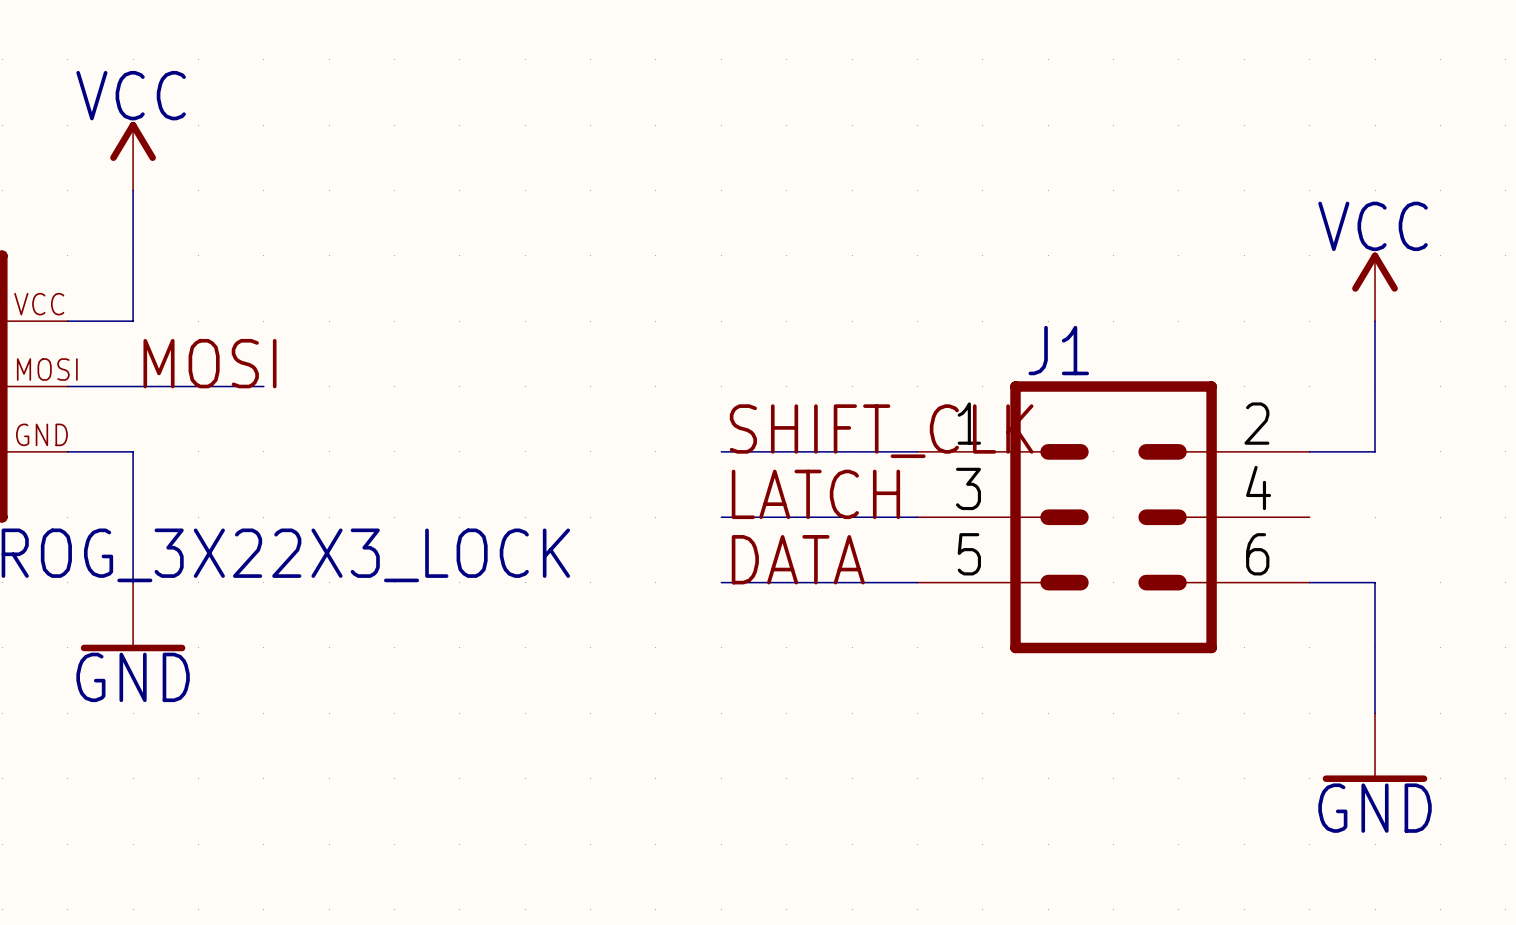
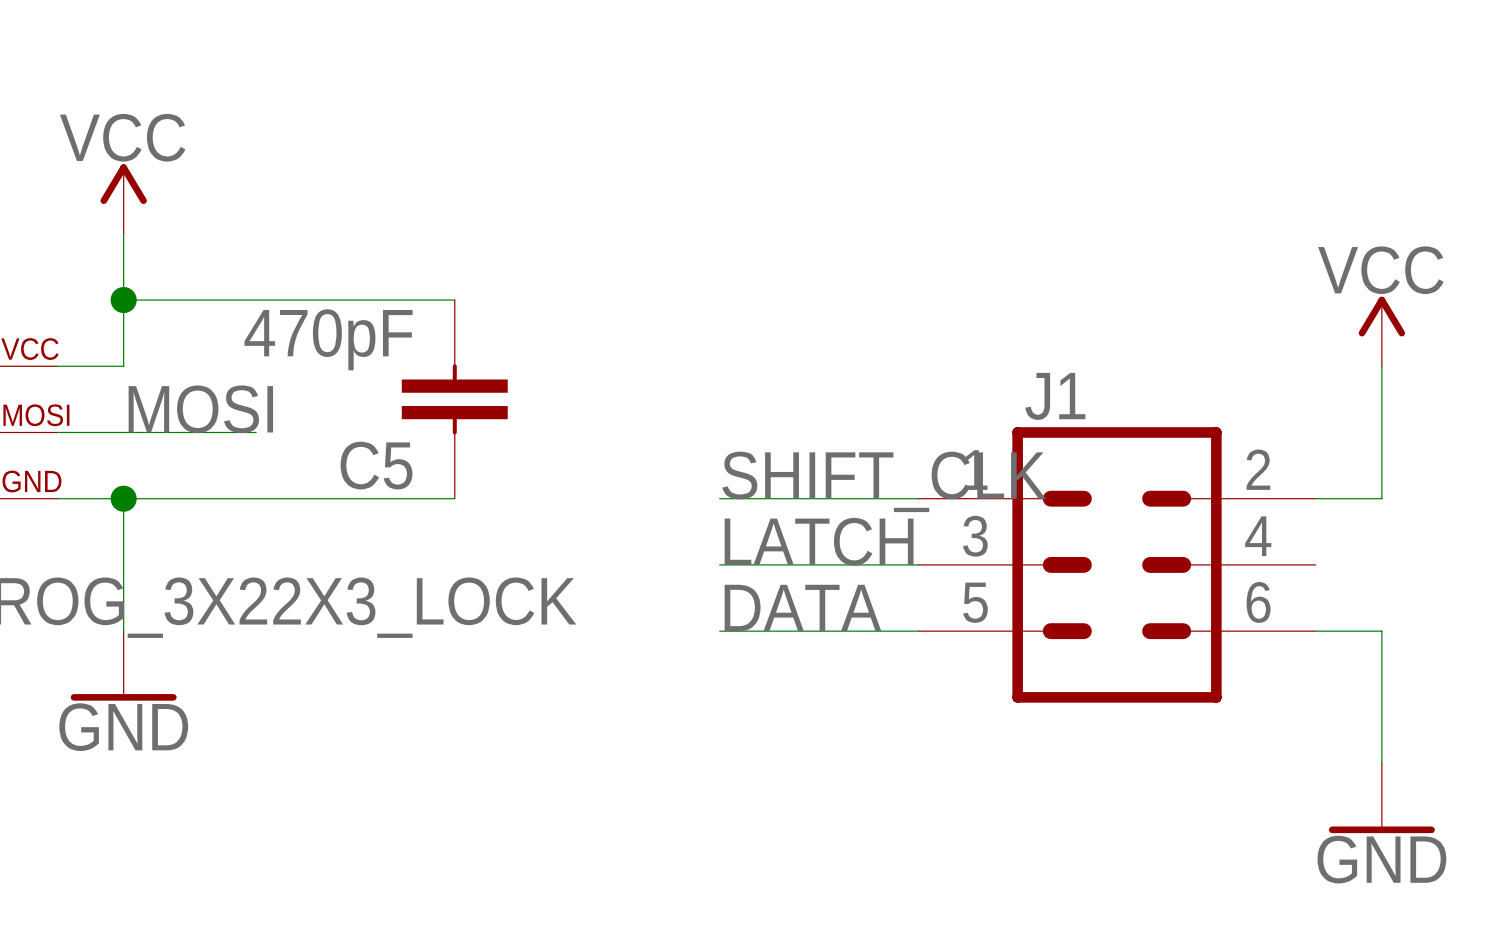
wire: none -> (123, 300) (454, 300)
junction: none -> (123, 300)
C5: none -> 470pF (454, 399)
wire: none -> (123, 498) (454, 498)
junction: none -> (123, 498)

